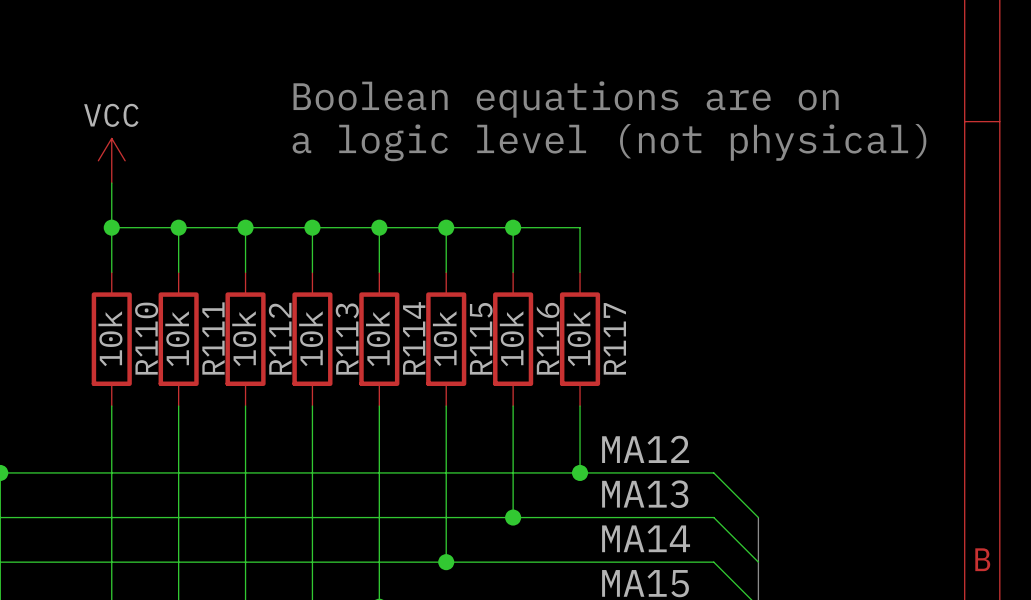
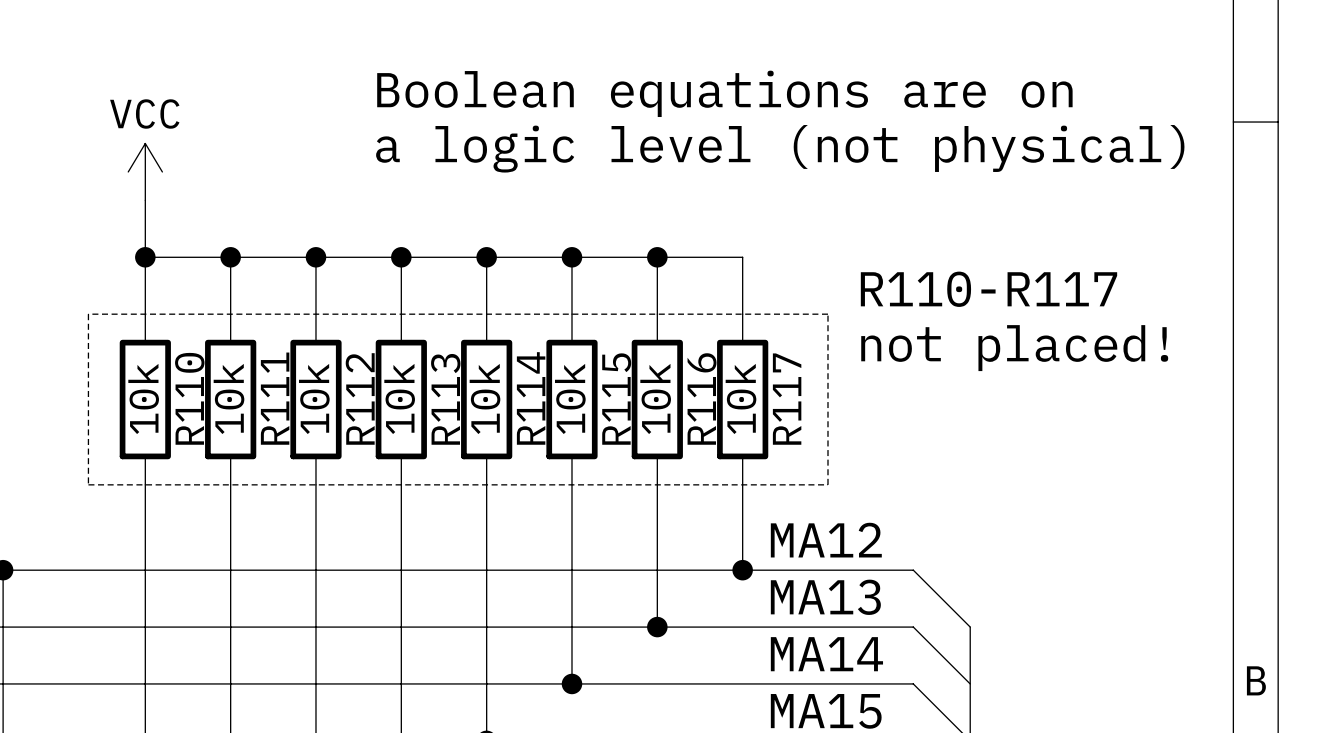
text: none -> R110-R117 (988, 289)
line: none -> (88, 314) (88, 484) (827, 484) (827, 314) (88, 314)
text: none -> not placed! (1014, 348)

